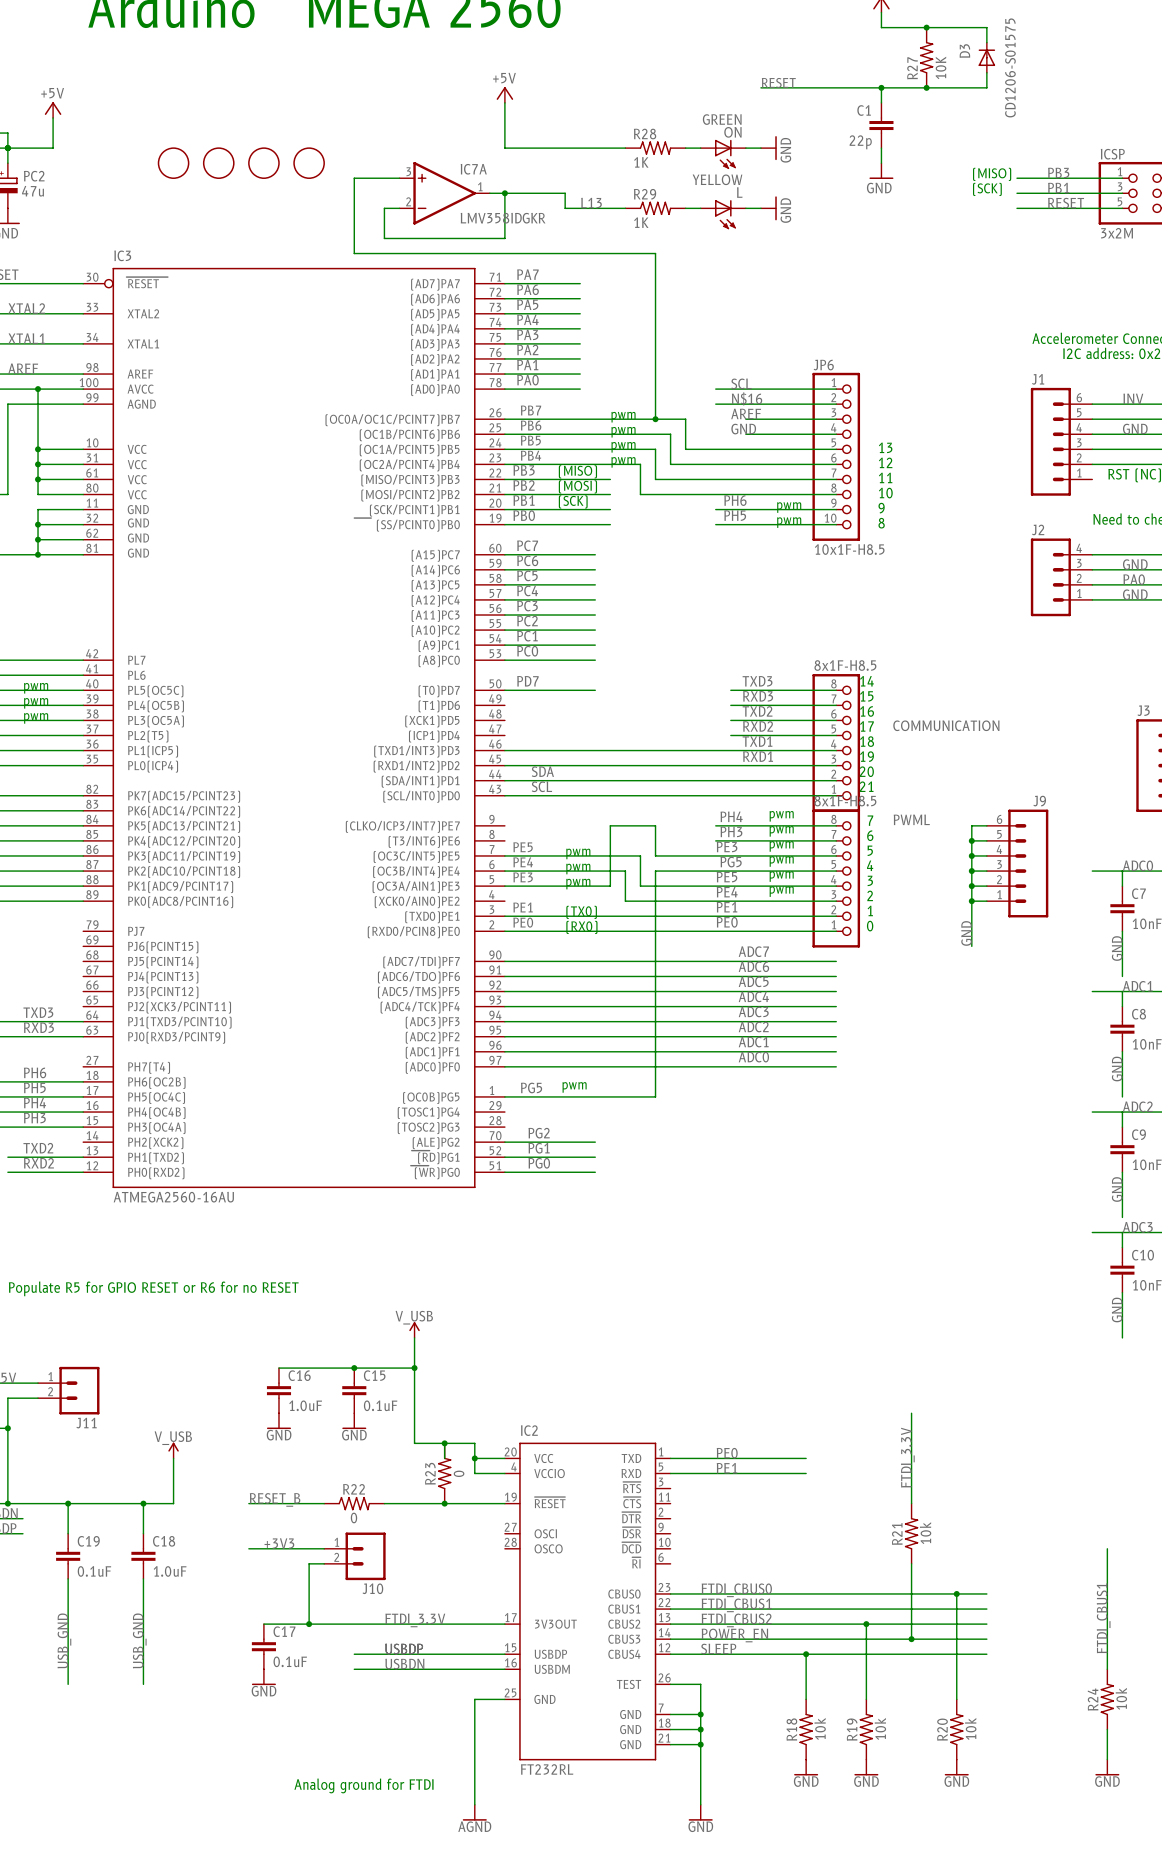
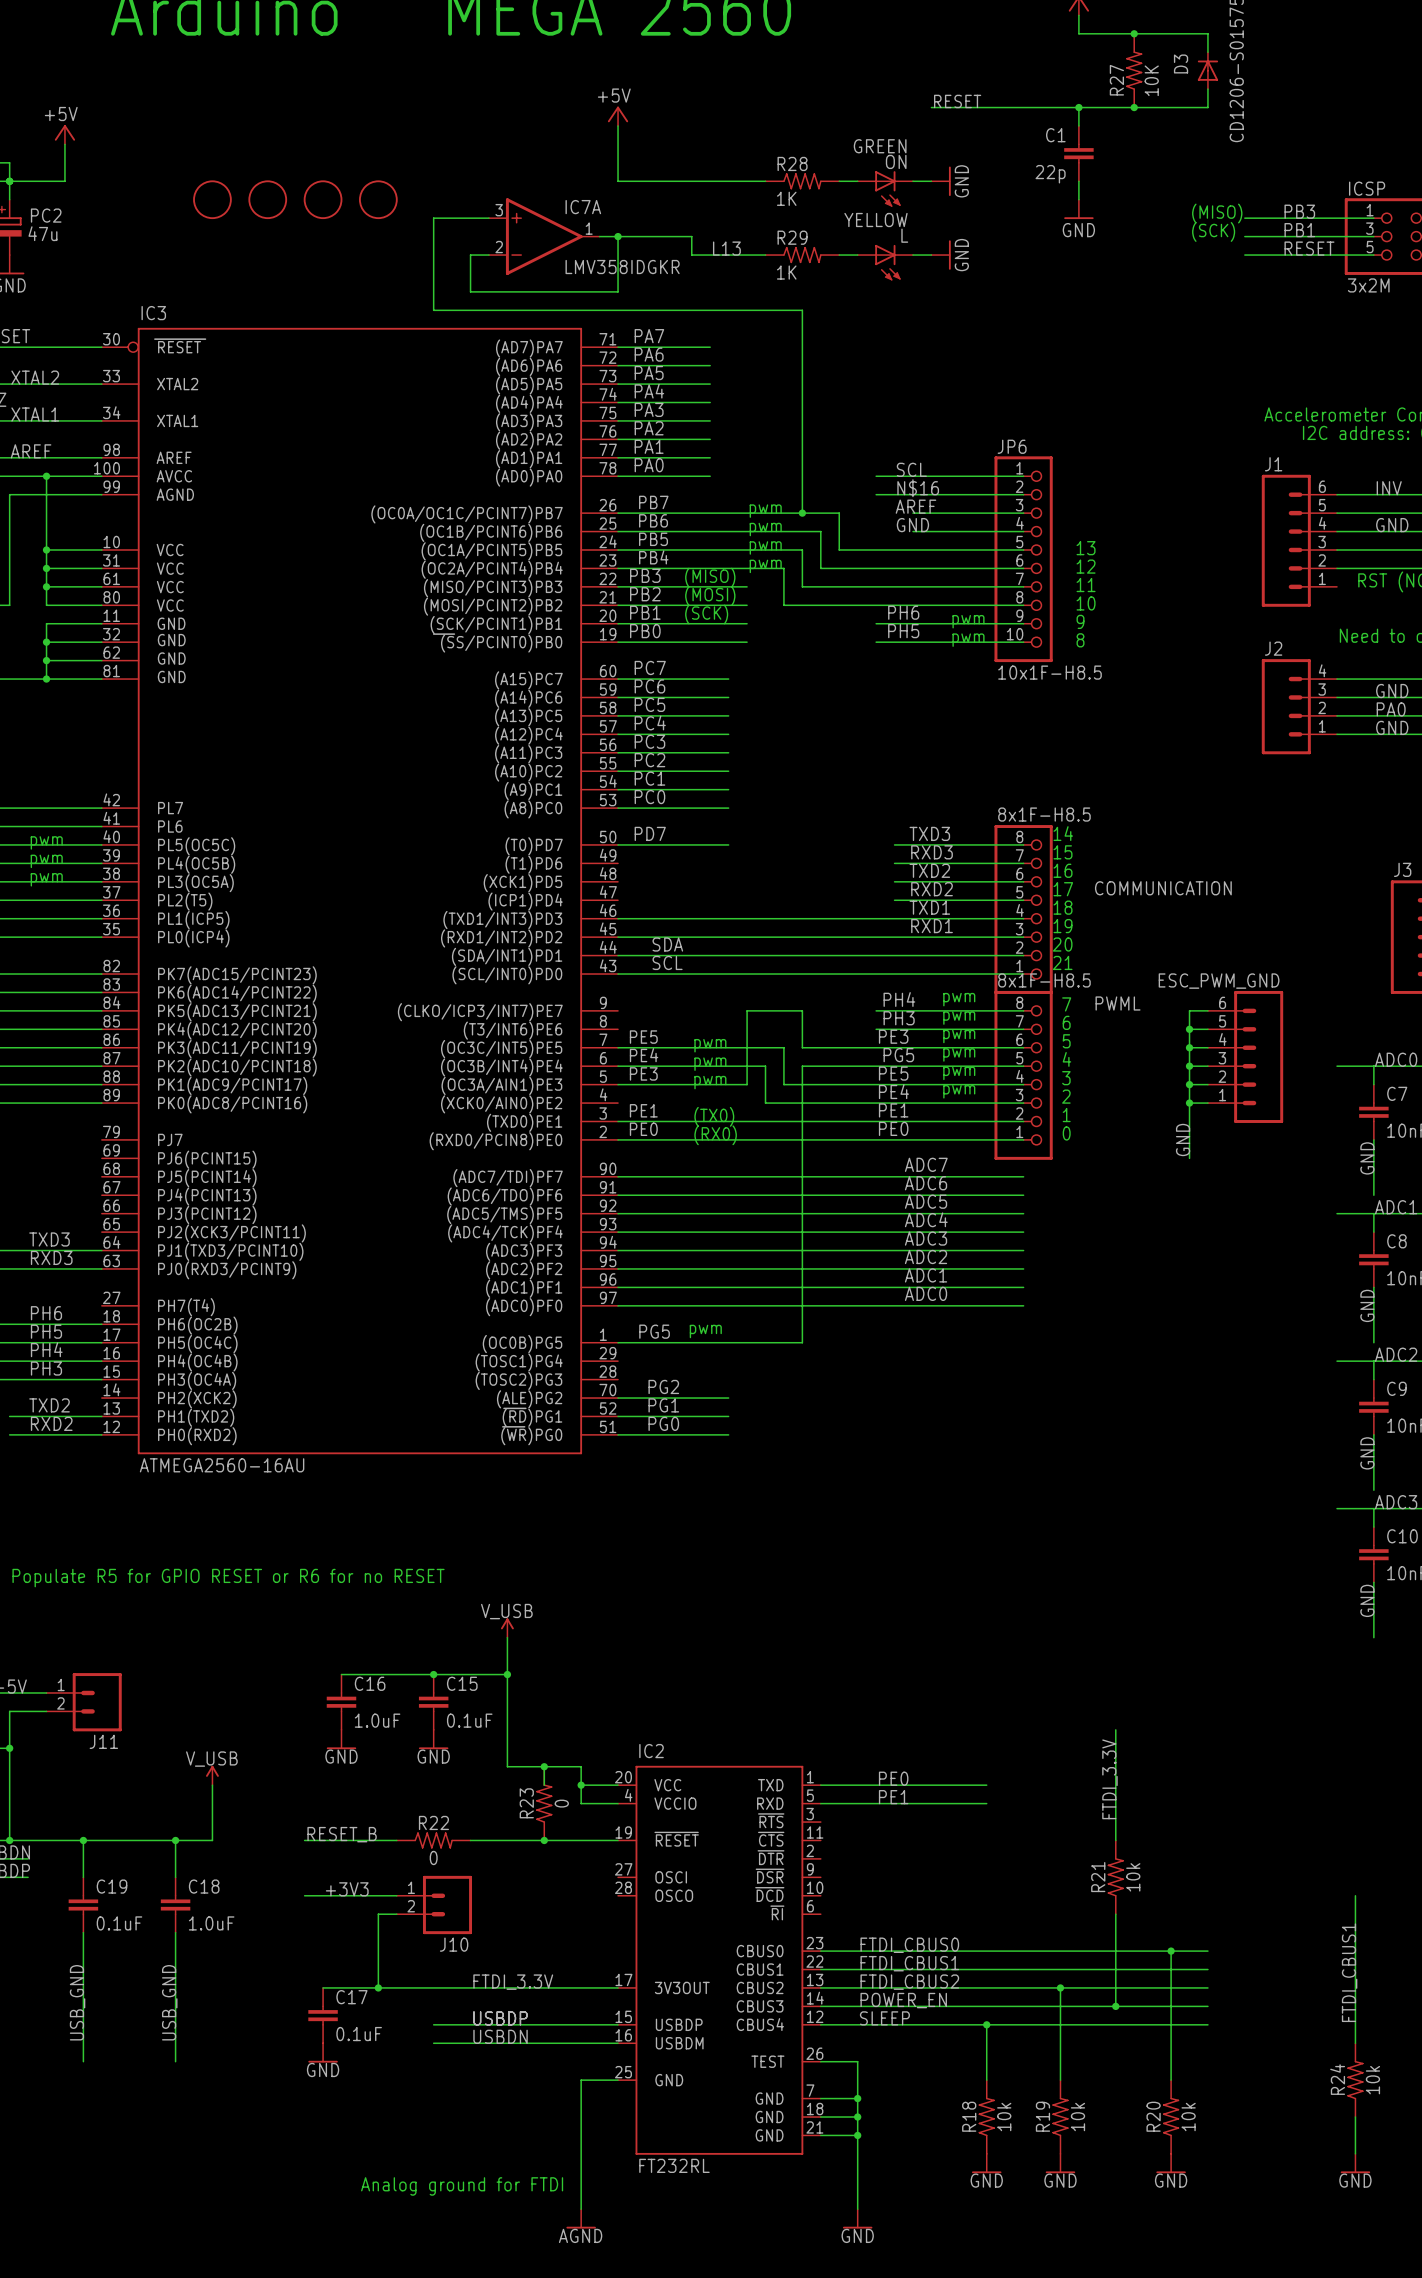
J9 name: J9 (1039, 801) -> ESC_PWM_GND (1219, 981)

